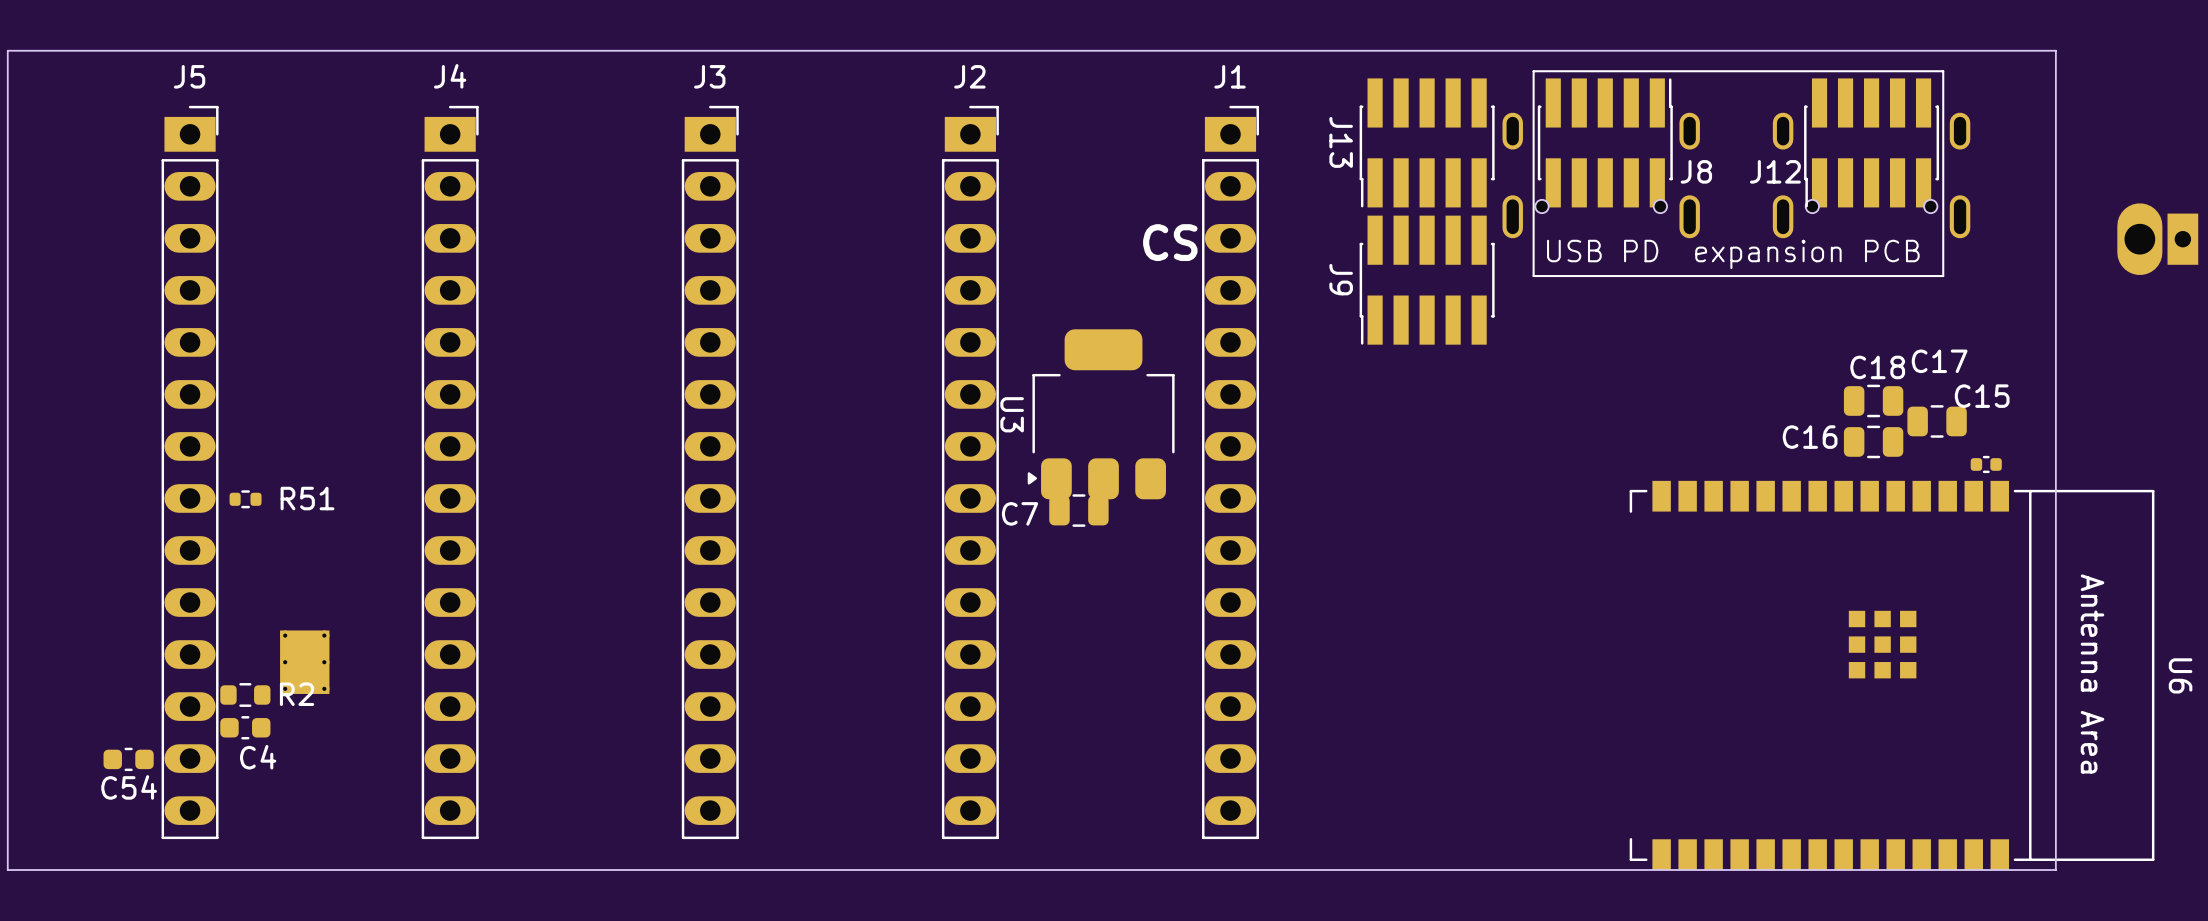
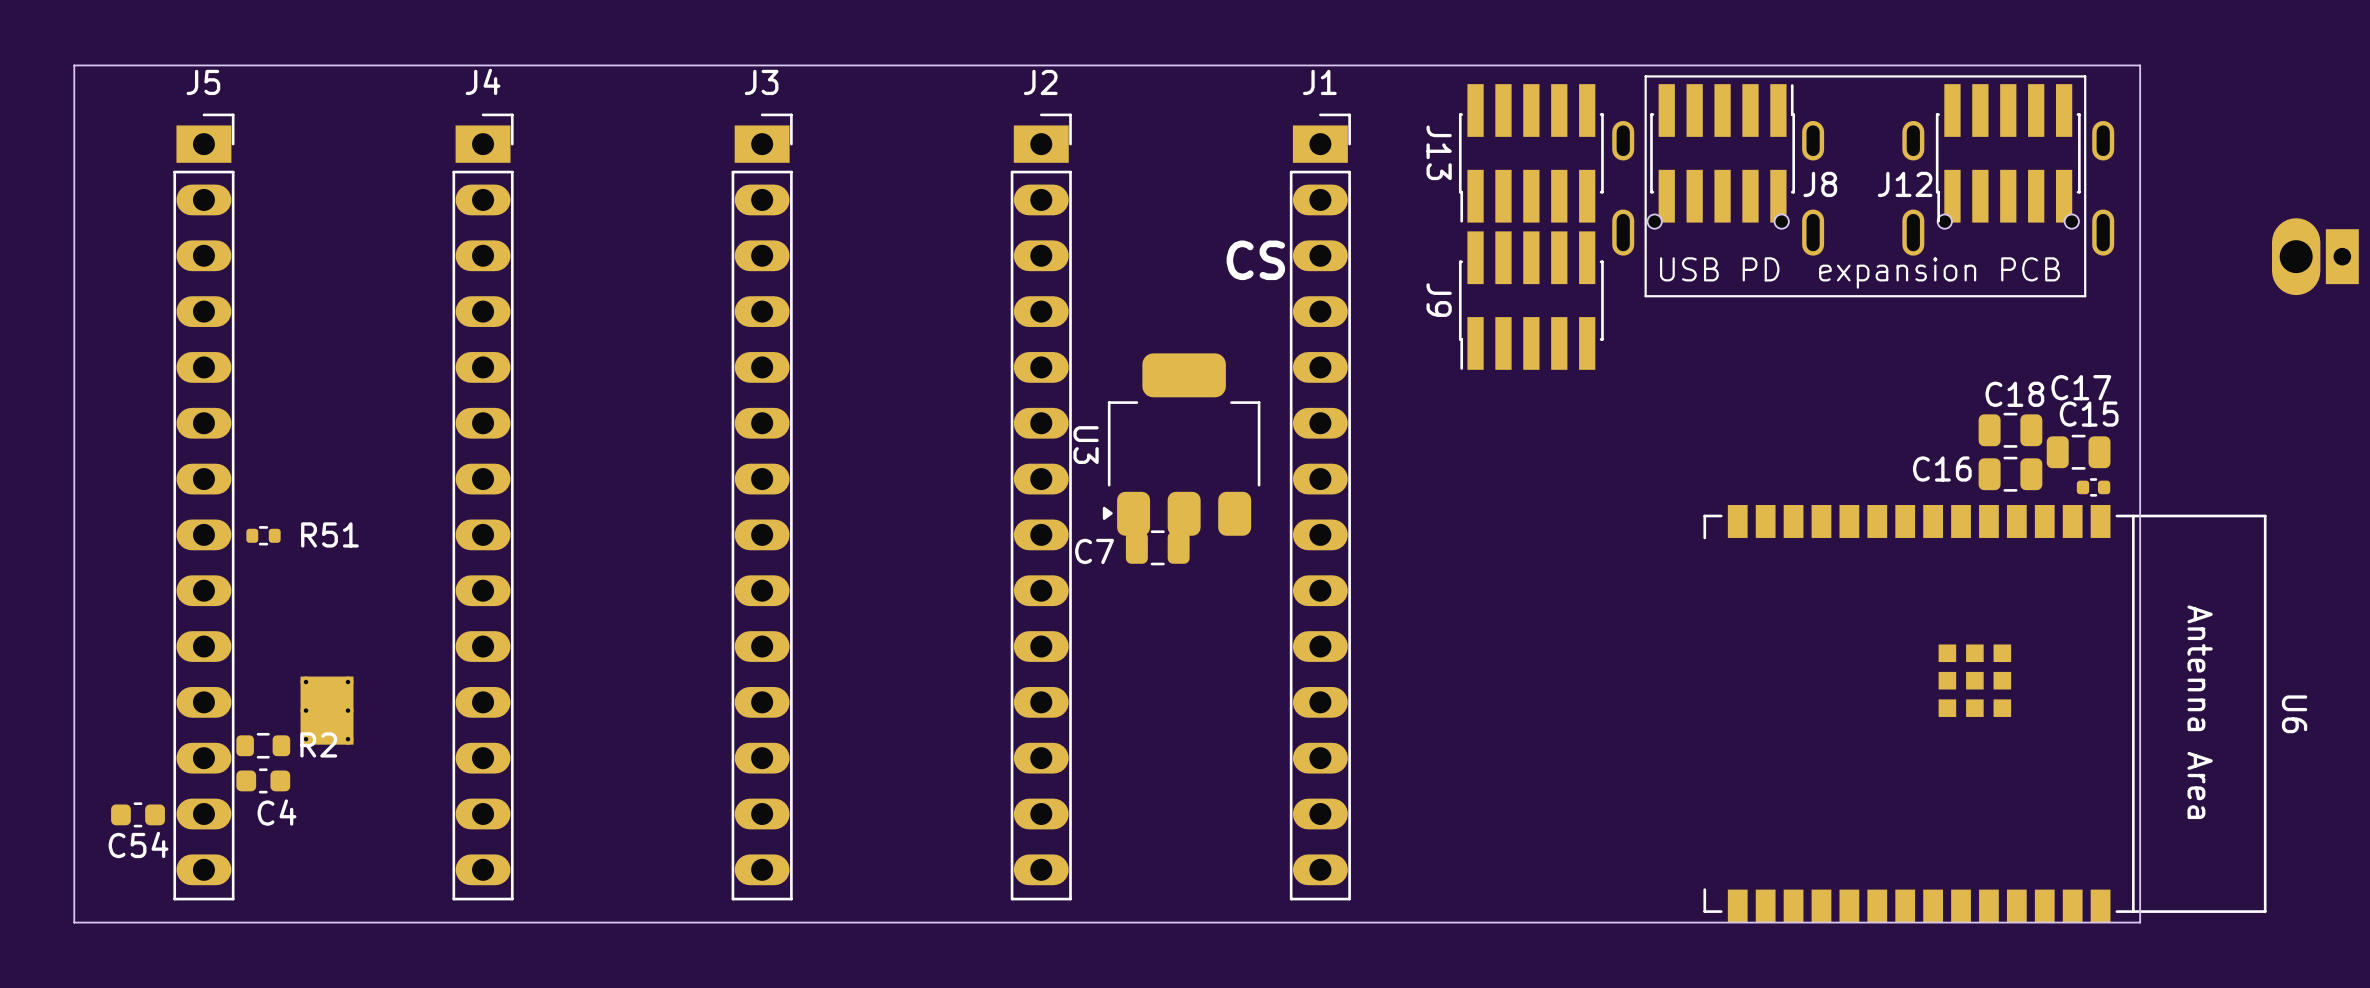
board edge: (2055, 50) (7, 50) (7, 870) (2055, 870) (2055, 50) -> (2140, 65) (2140, 922) (74, 922) (74, 65) (2140, 65)
C15 position: (1986, 464) -> (2093, 487)
U6 position: (1892, 675) -> (1984, 713)

